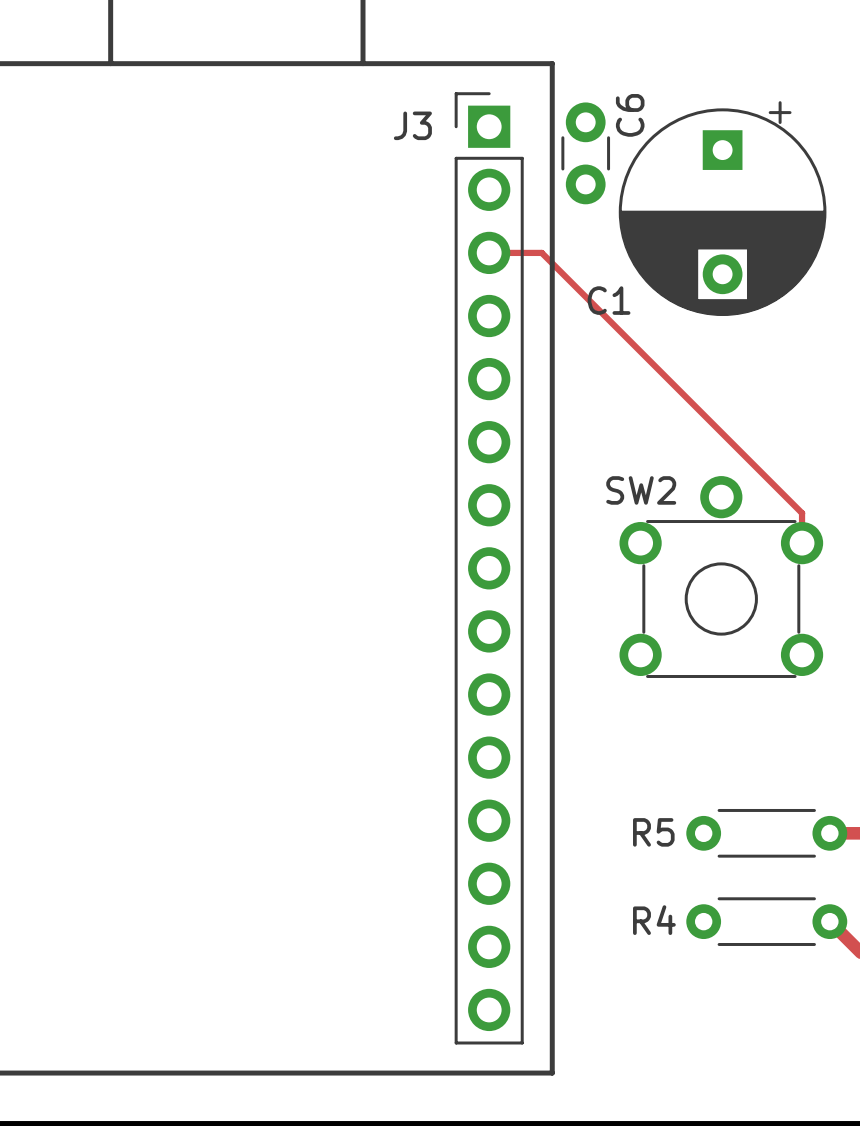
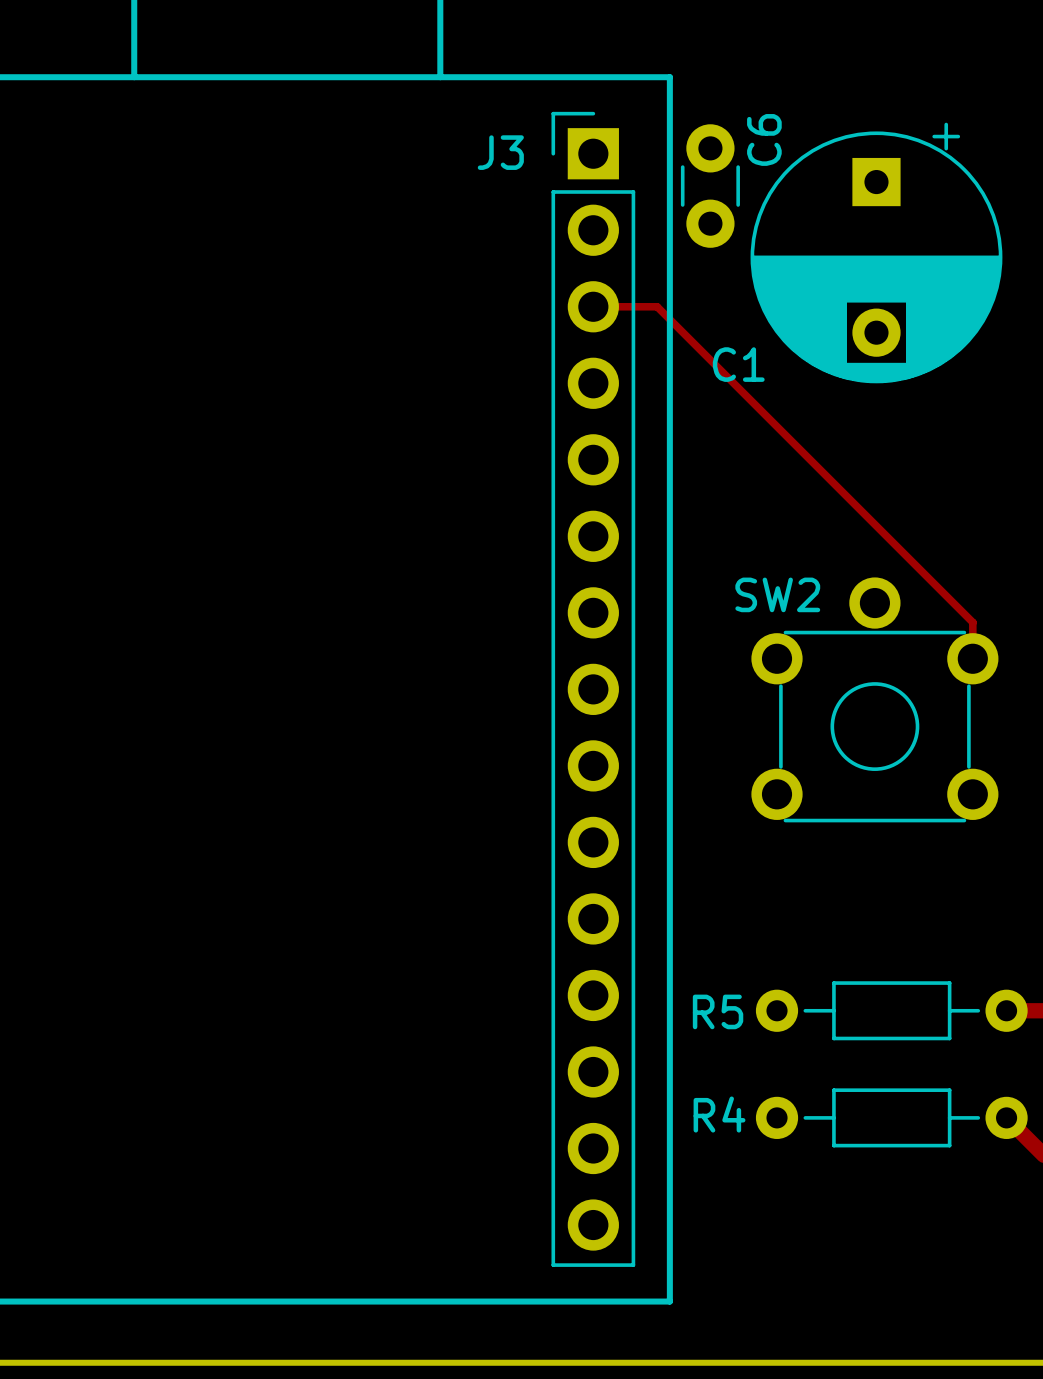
R5 footprint: [686, 808, 848, 858] -> [755, 981, 1028, 1041]
R4 footprint: [686, 897, 848, 946] -> [755, 1088, 1028, 1148]

